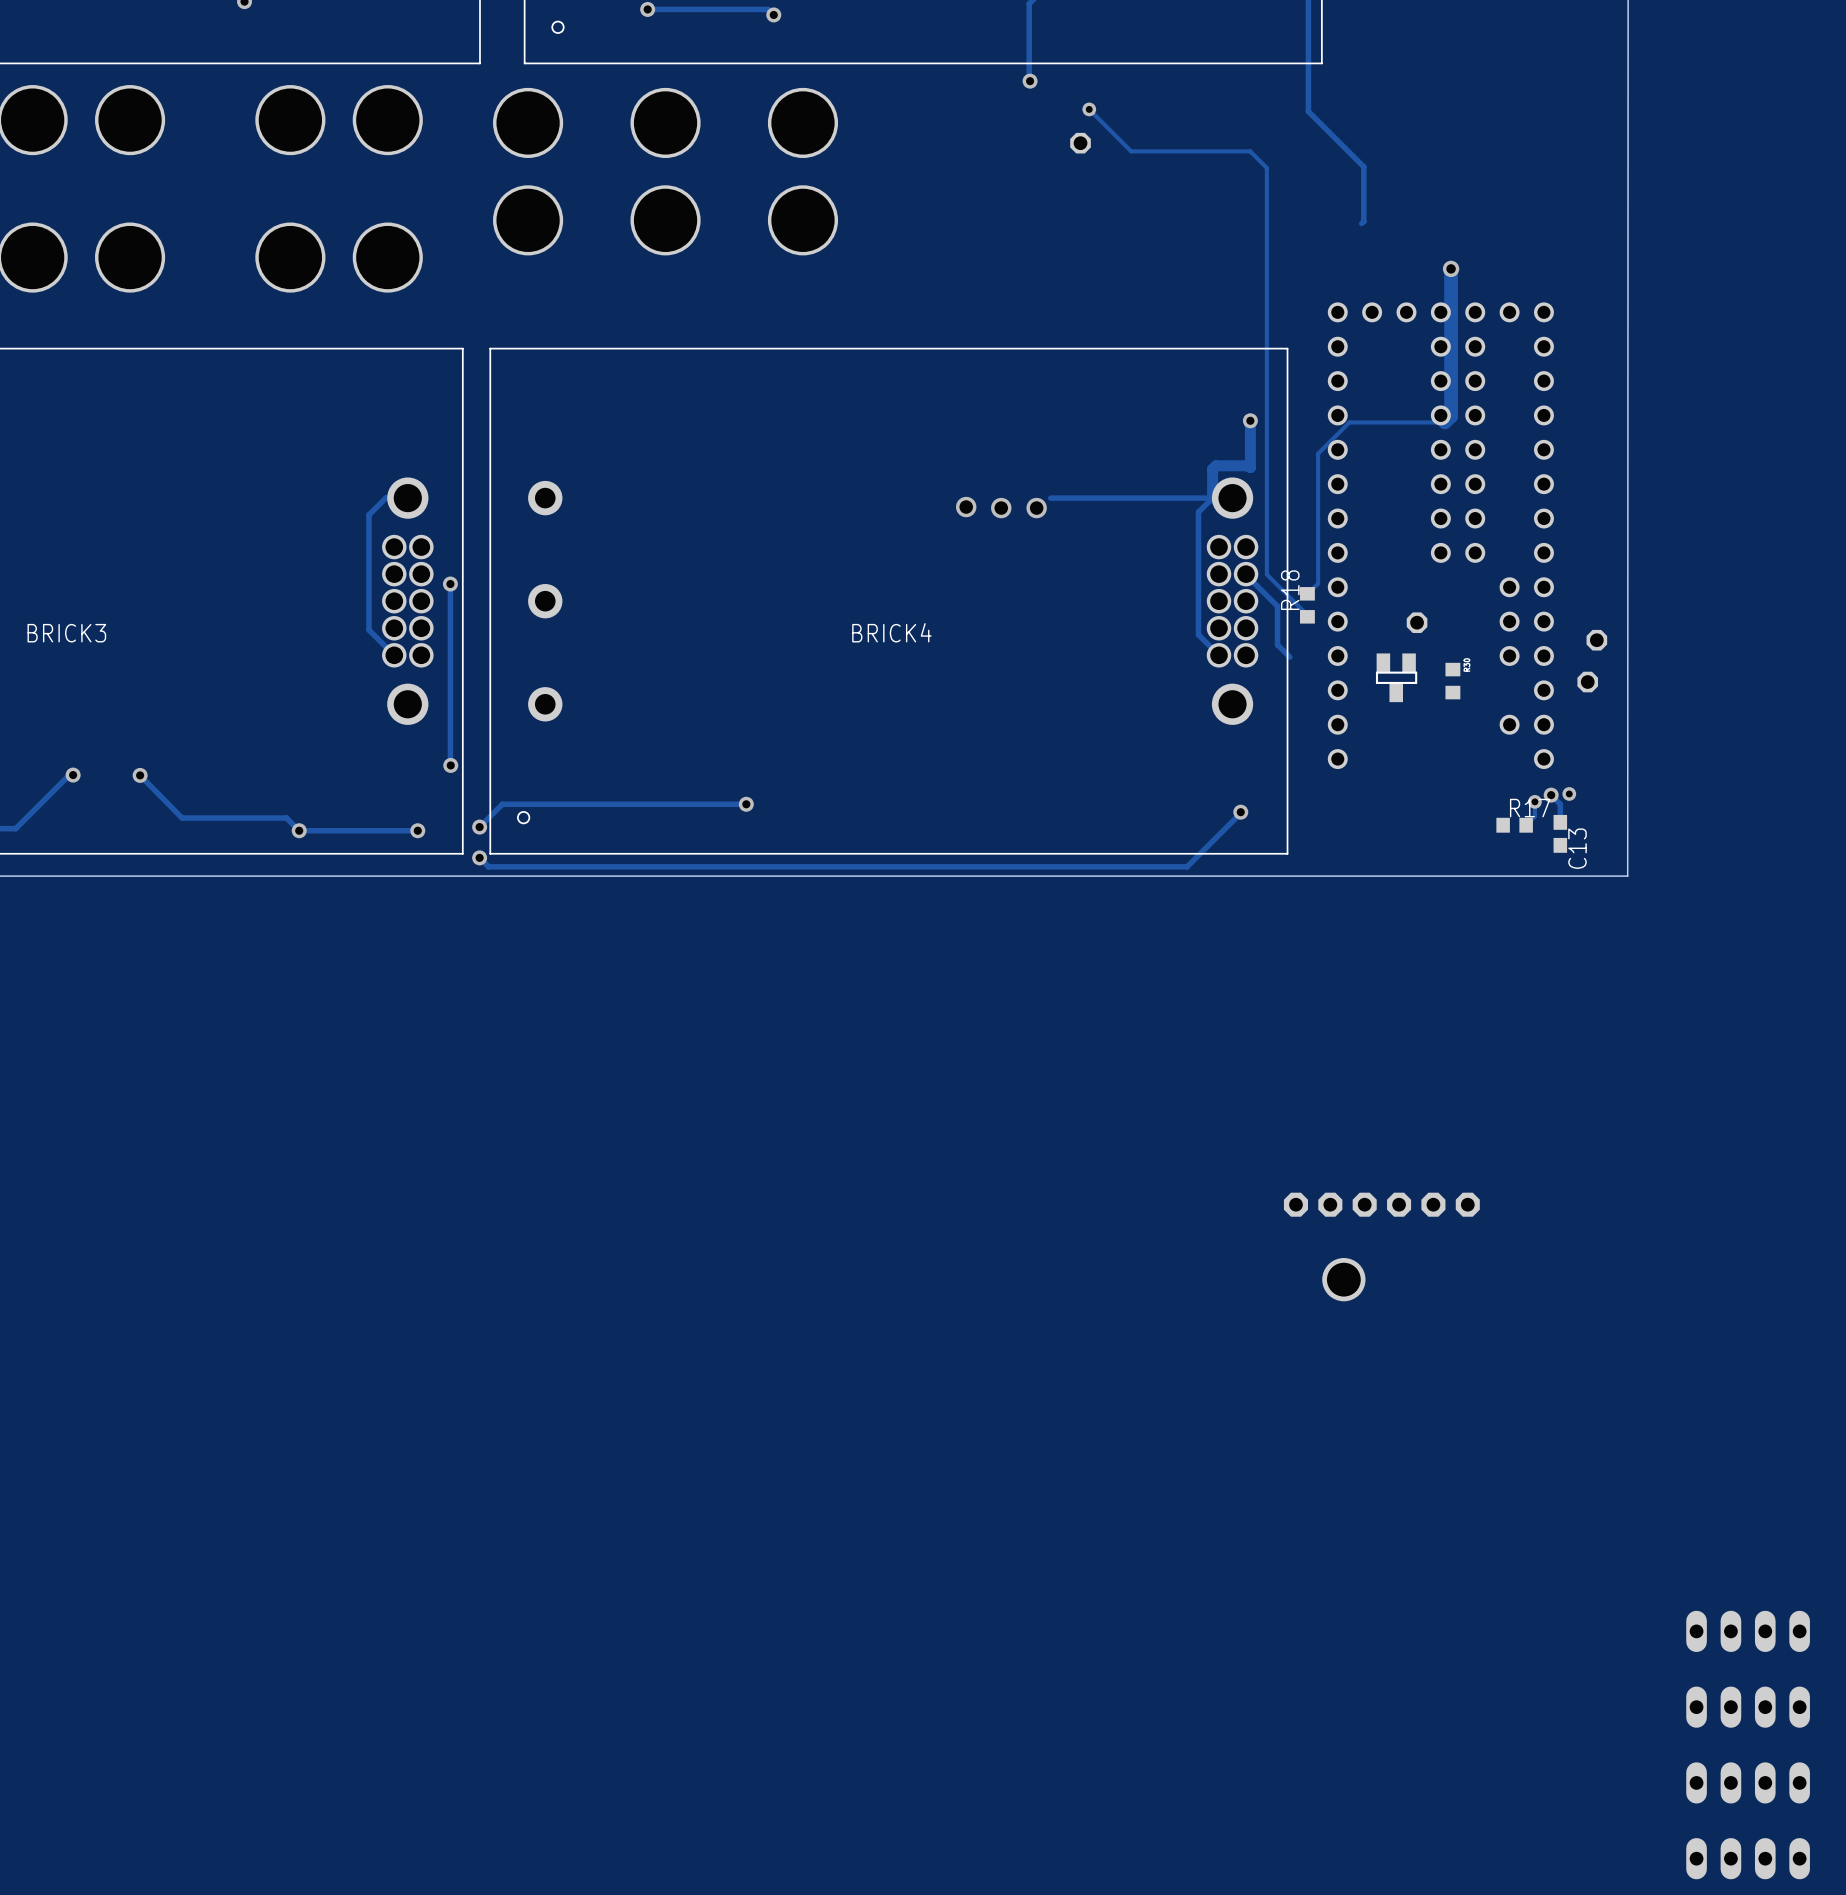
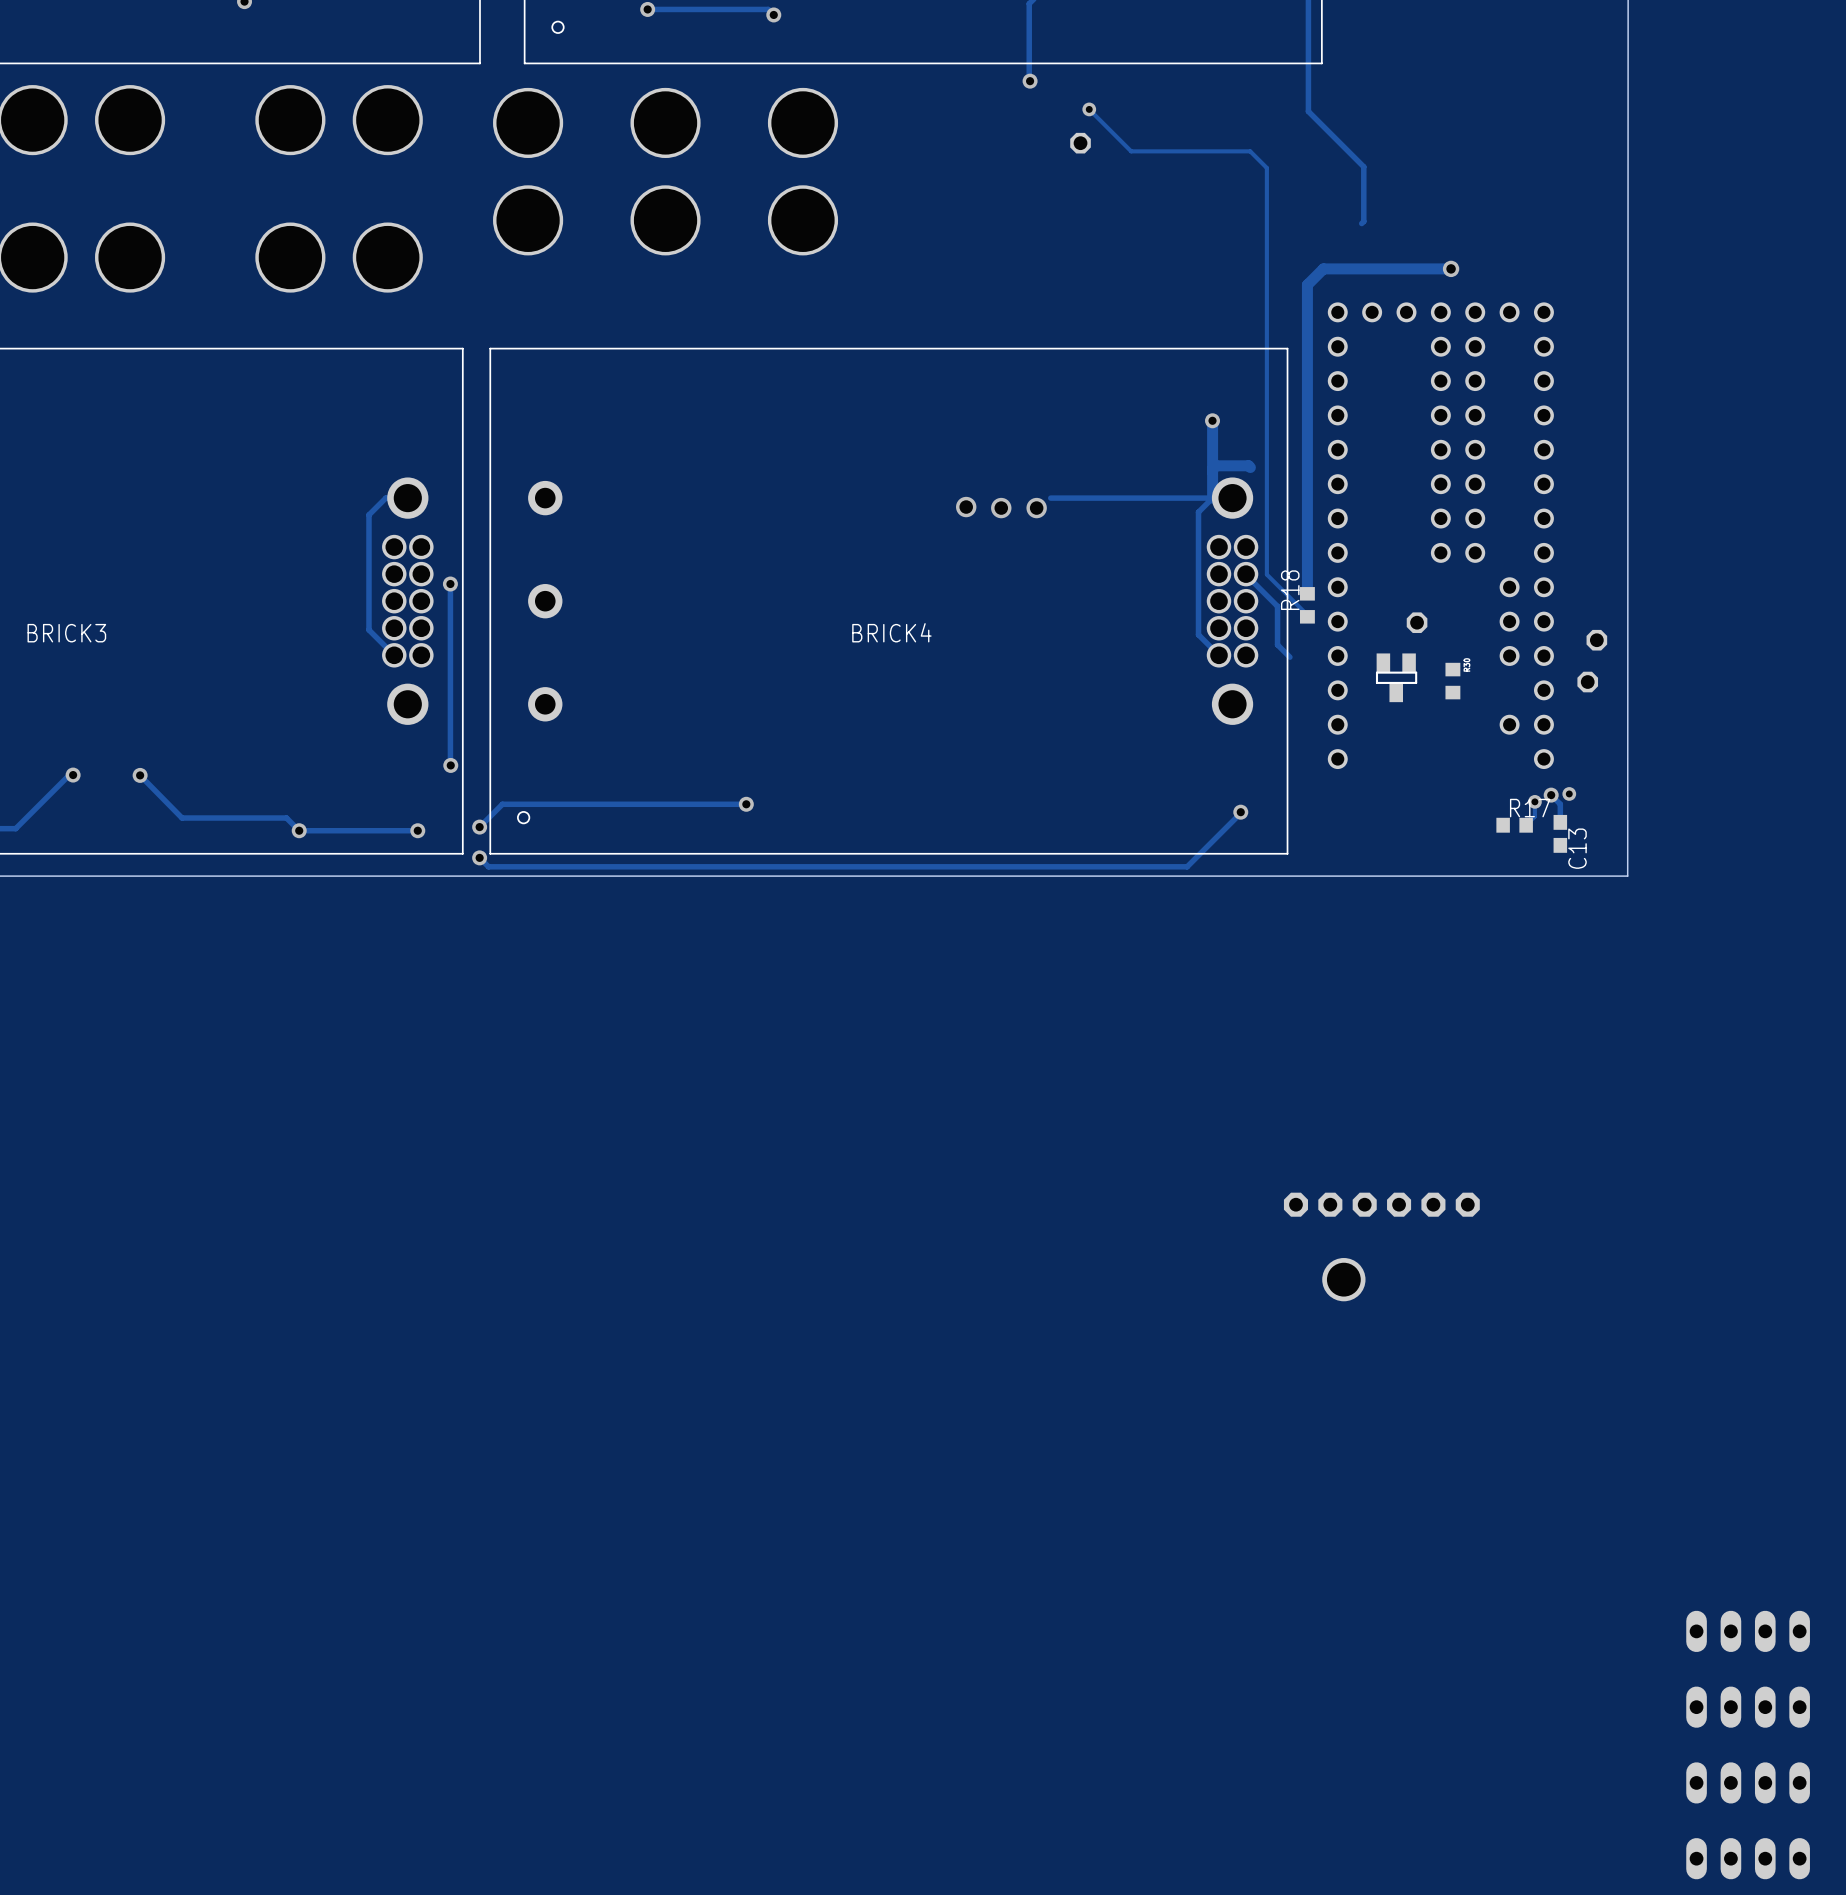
track: (1451, 268) (1451, 416) (1444, 422) (1349, 422) (1318, 453) (1318, 583) (1307, 593) -> (1451, 268) (1323, 268) (1307, 284) (1307, 593)
track: none -> (1212, 420) (1212, 469)
track: (1250, 420) (1250, 467) -> none
via position: (1250, 420) -> (1212, 420)

